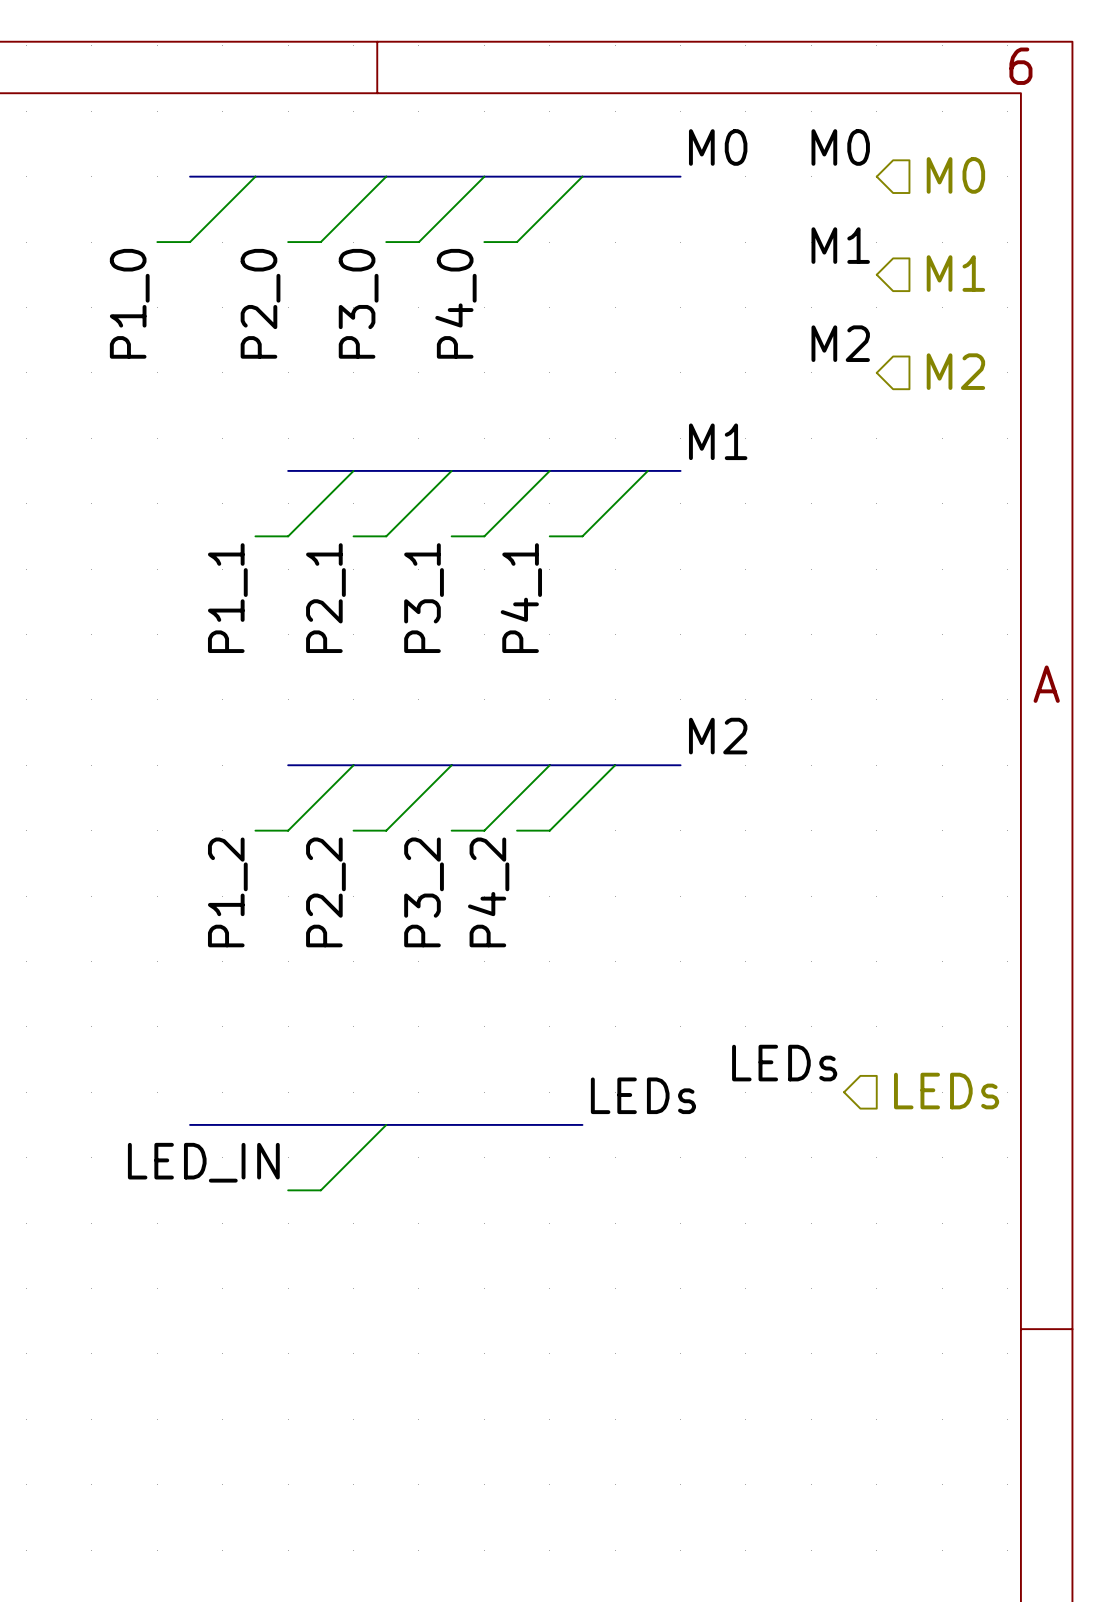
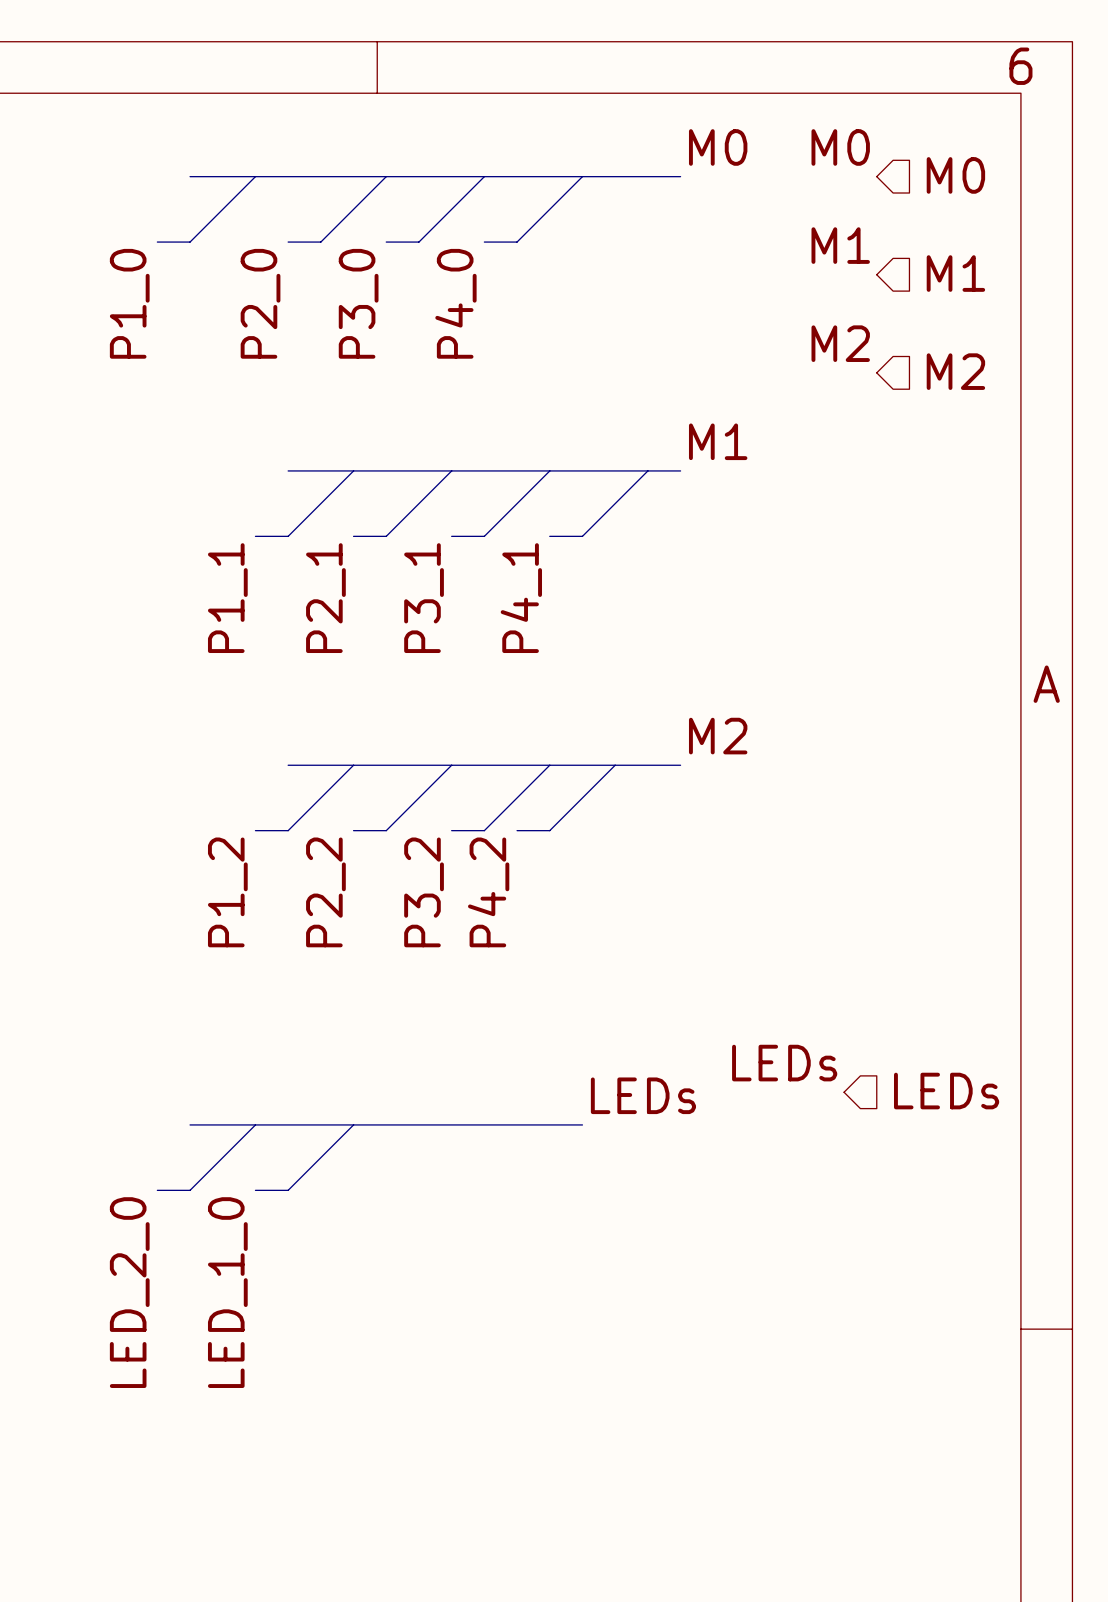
wire: none -> (255, 1124) (190, 1190) (157, 1190)
wire: (386, 1124) (320, 1190) (288, 1190) -> (353, 1124) (288, 1190) (255, 1190)
label: LED_IN (203, 1162) -> LED_1_0 (227, 1292)
label: none -> LED_2_0 (129, 1292)

